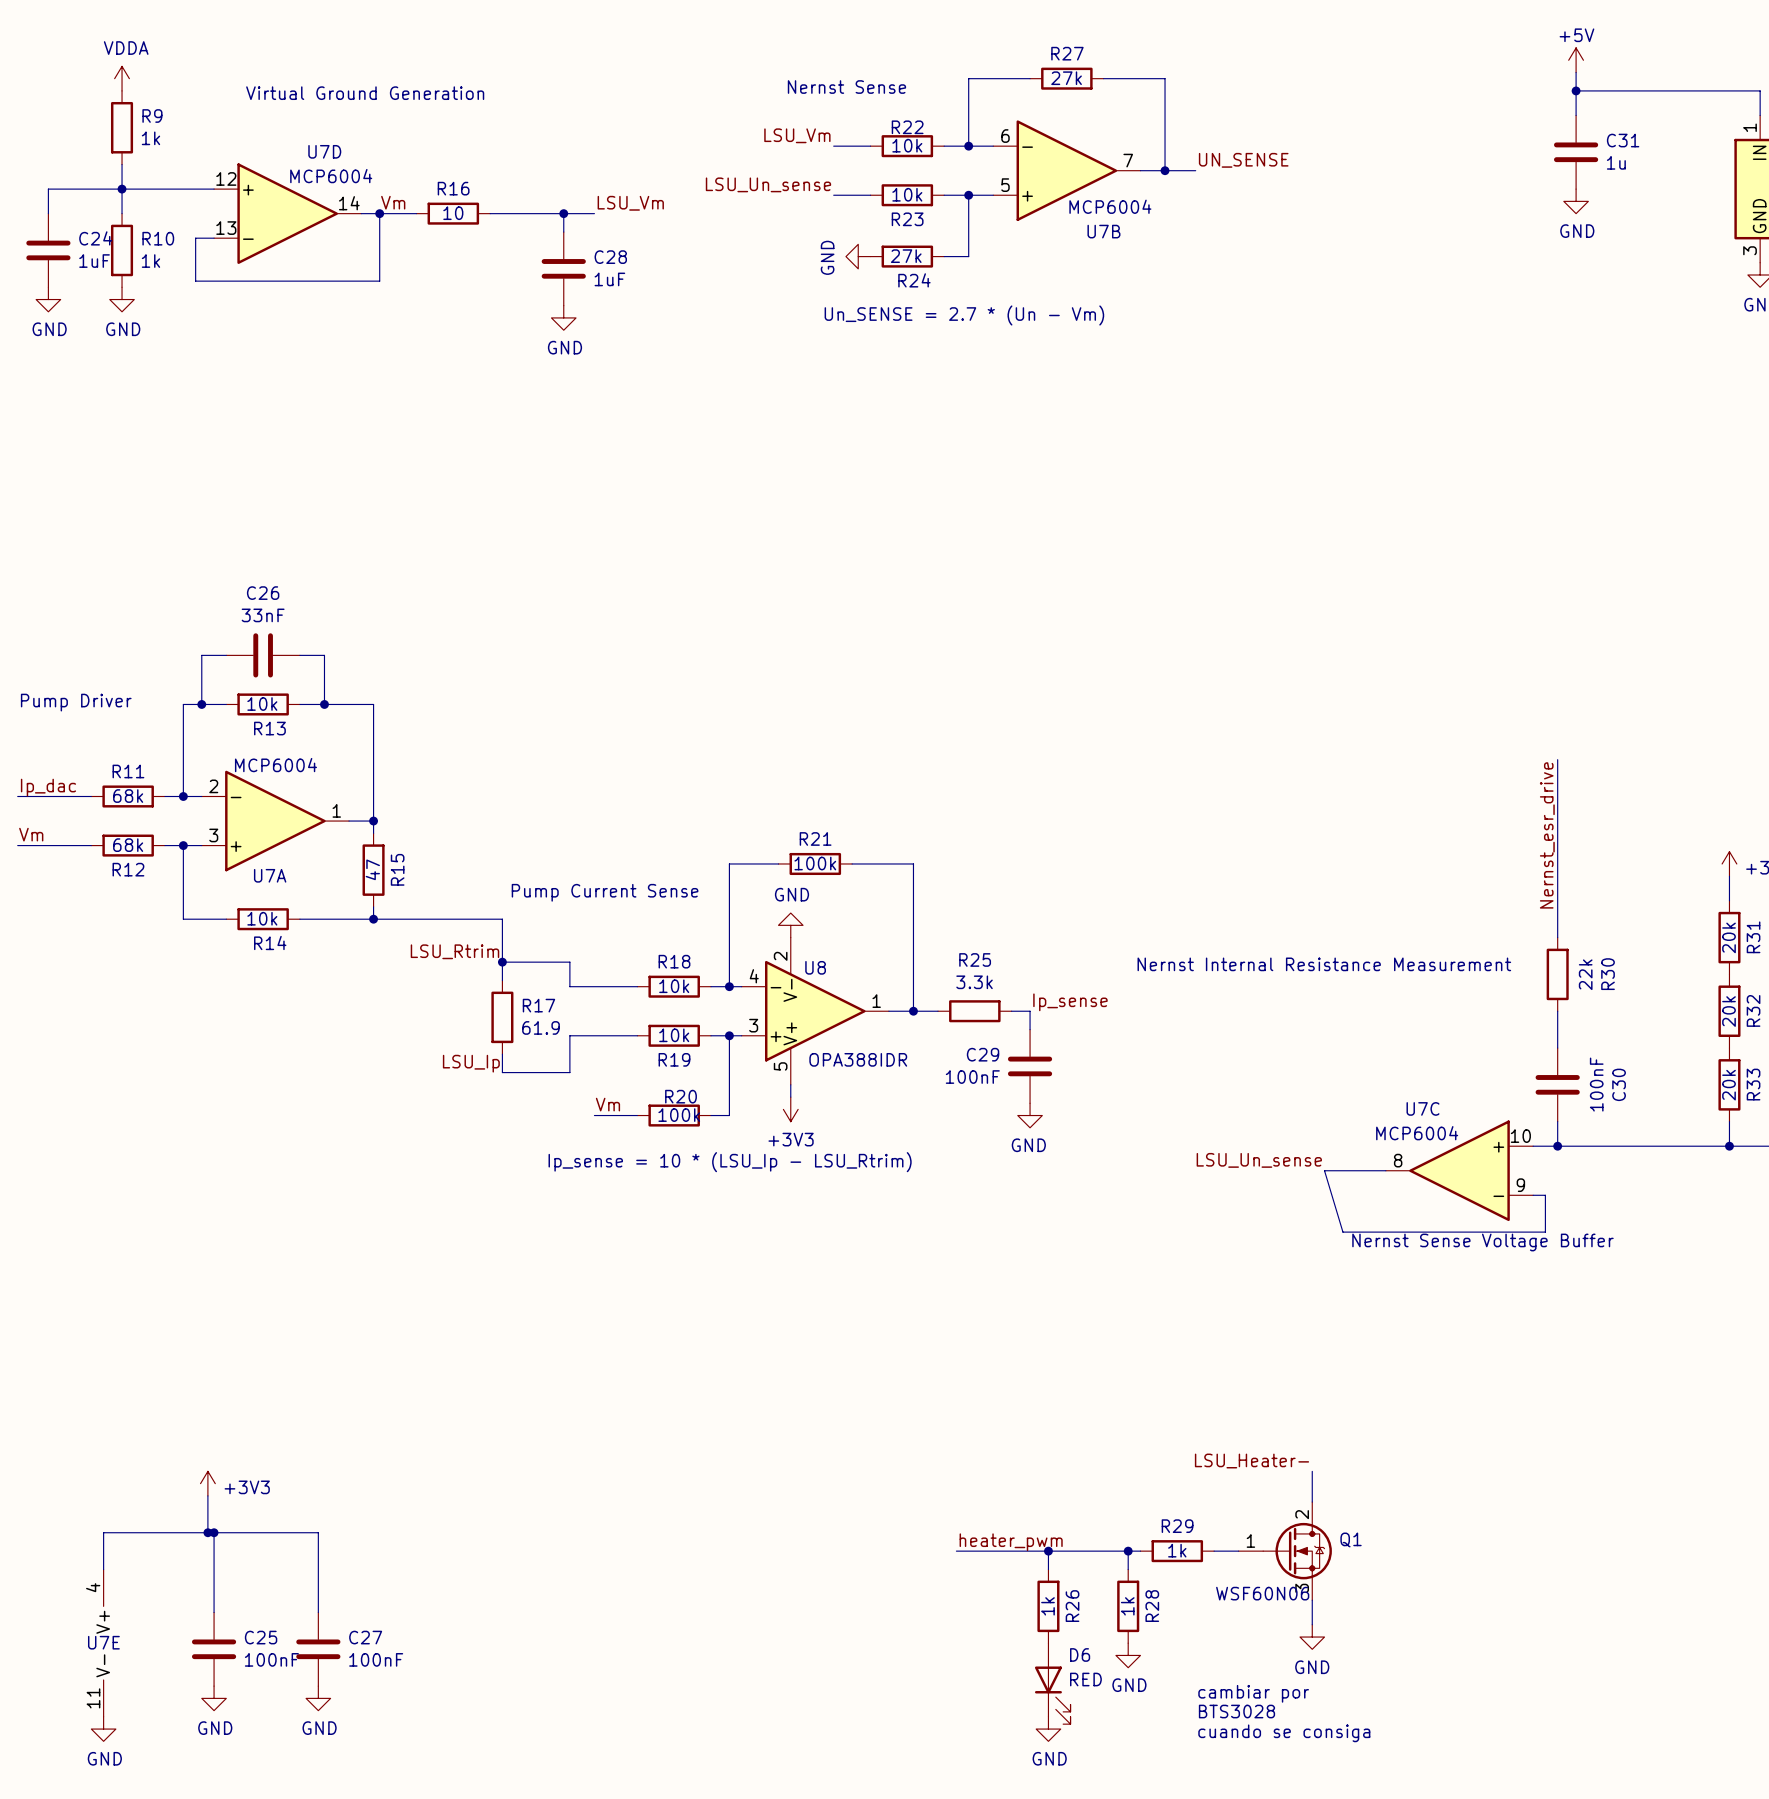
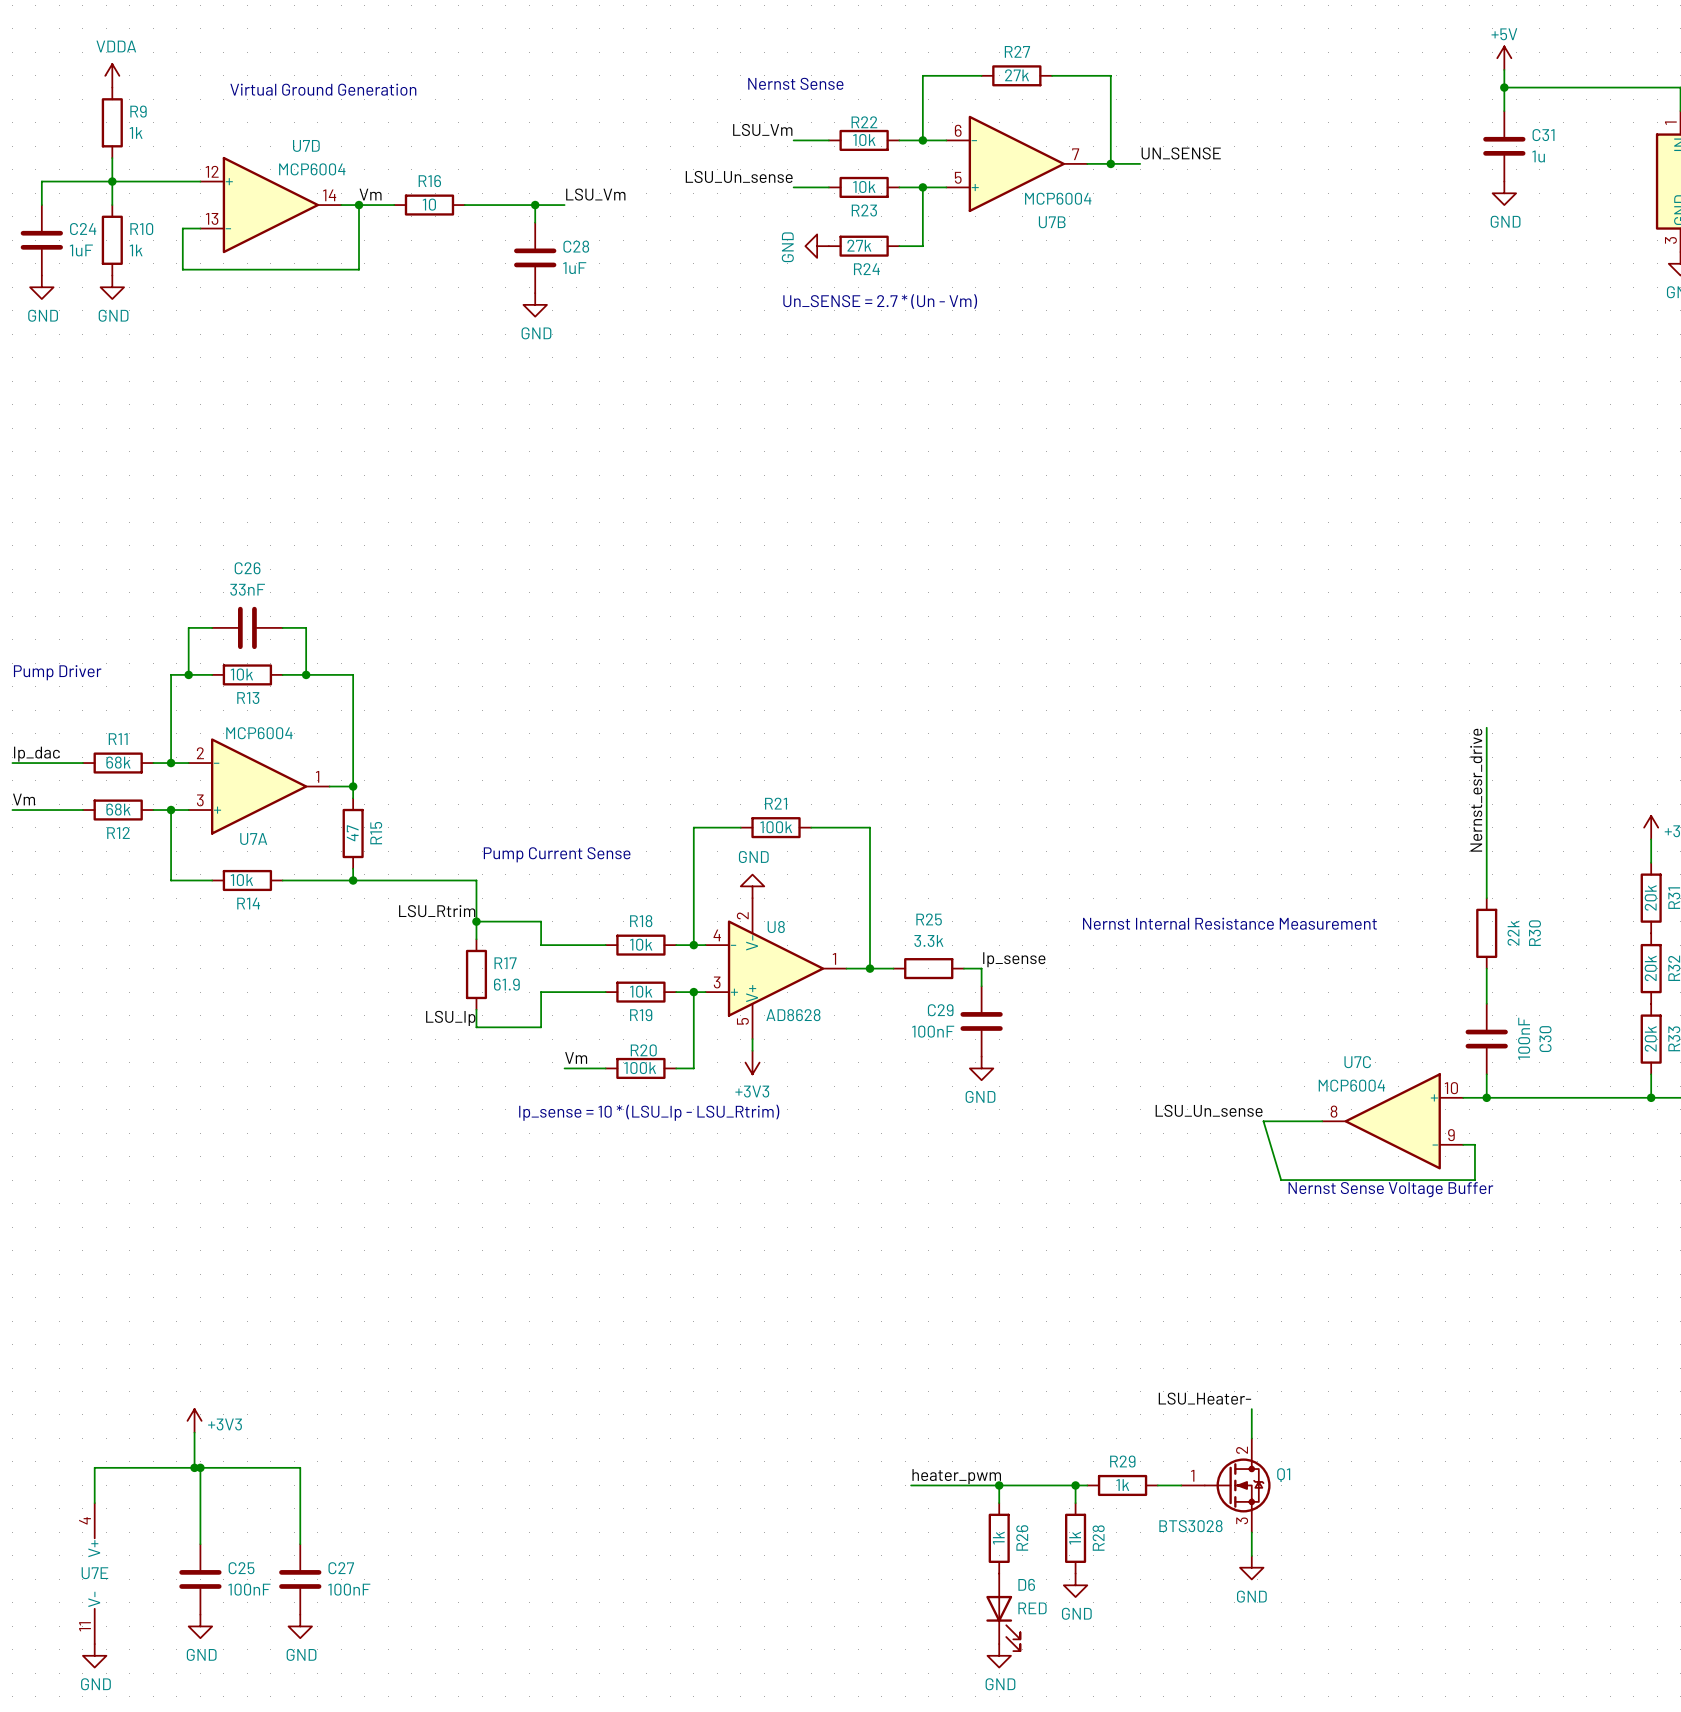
U8 value: OPA388IDR (858, 1059) -> AD8628 (793, 1015)
Q1 value: WSF60N06 (1262, 1593) -> BTS3028 (1190, 1526)
text: cambiar por (1253, 1693) -> none
text: BTS3028 (1236, 1711) -> none
text: cuando se consiga (1284, 1733) -> none

